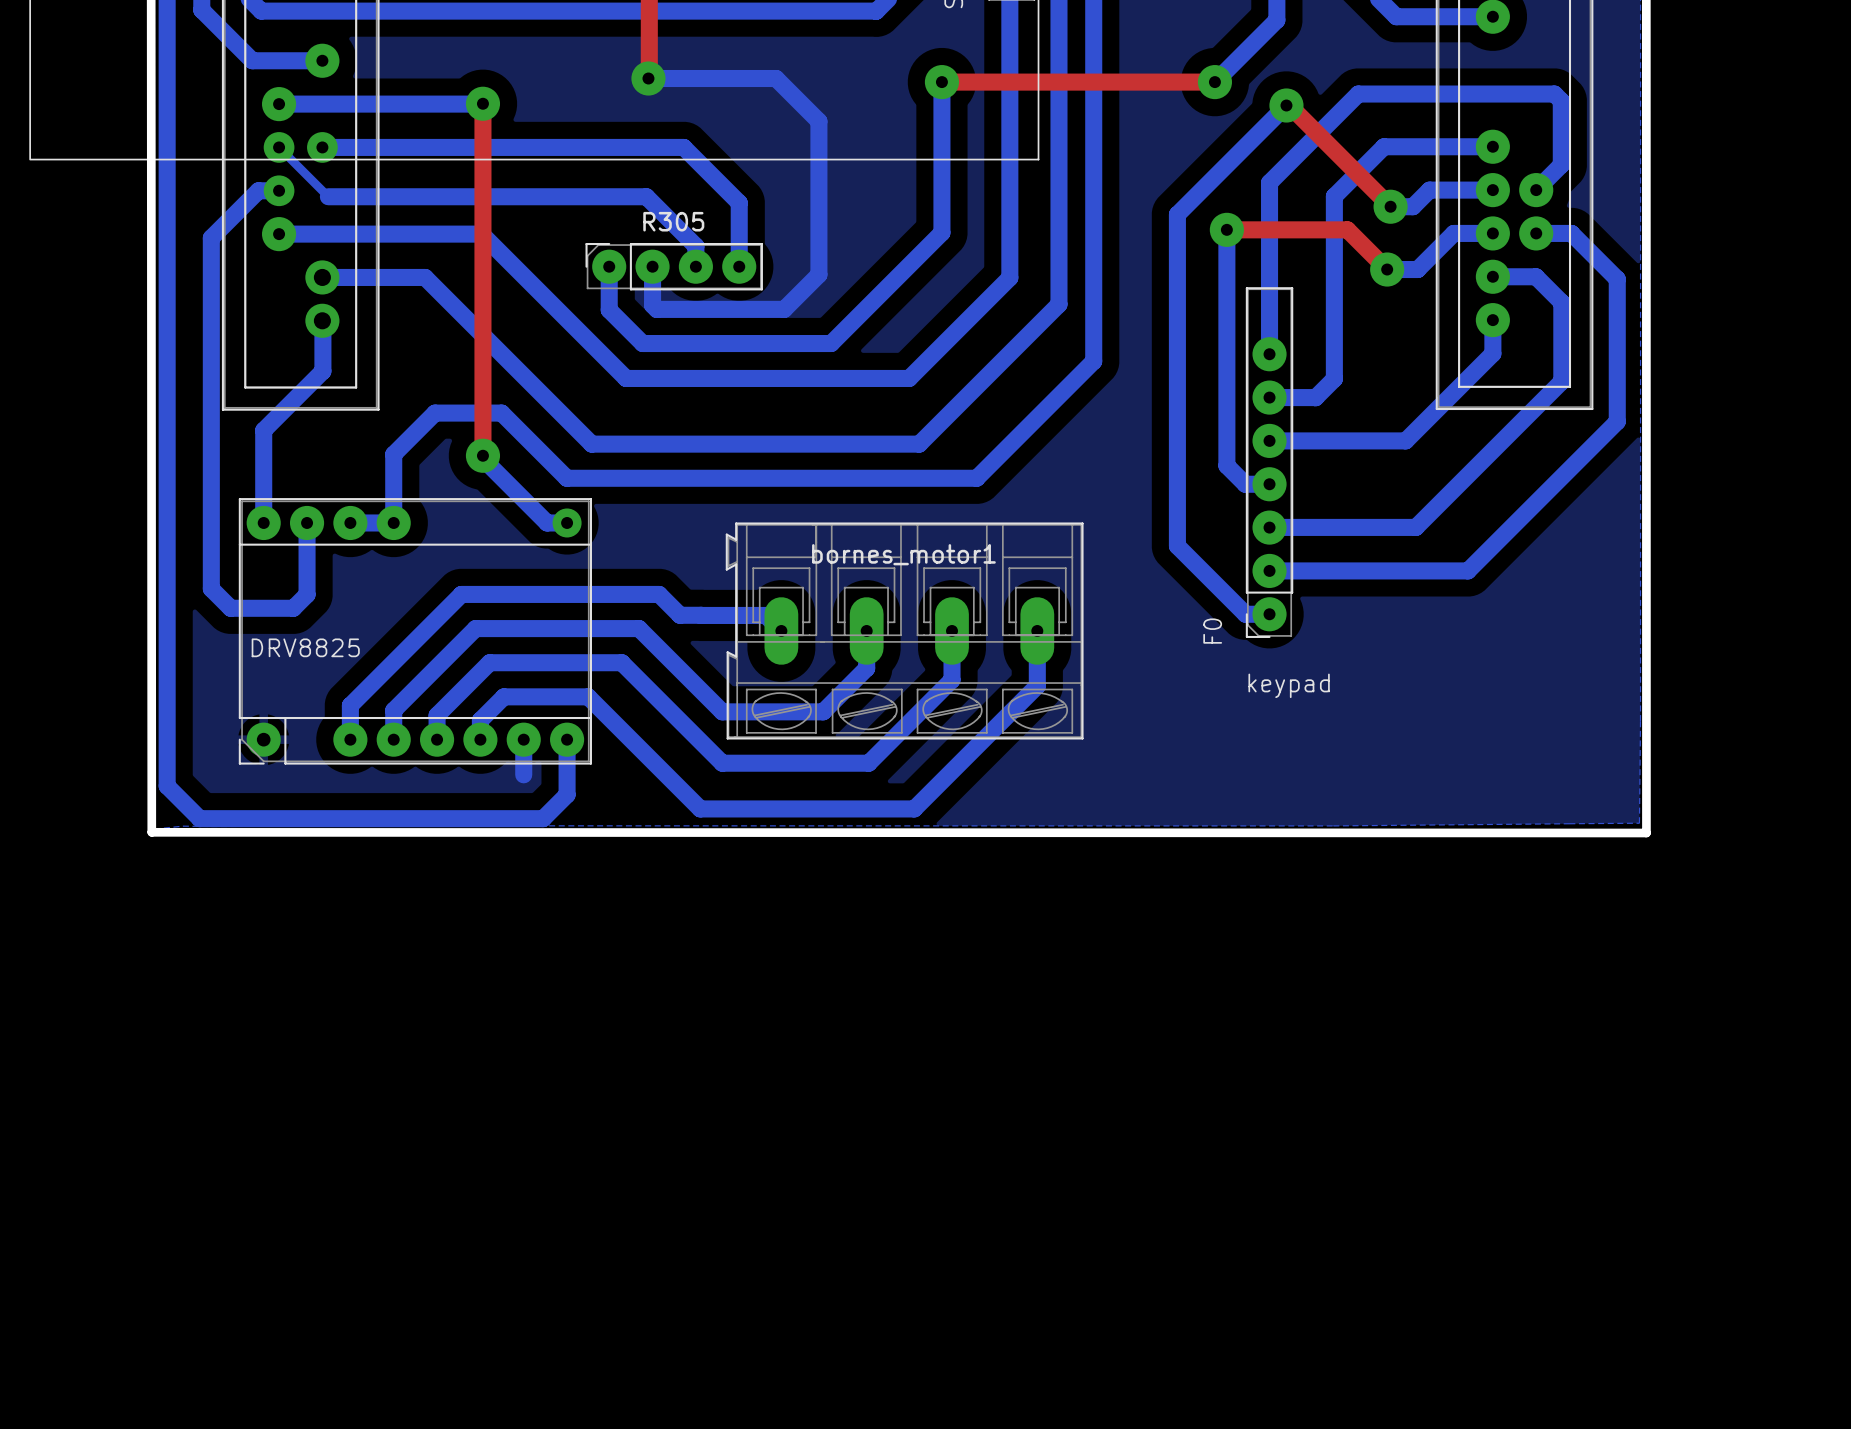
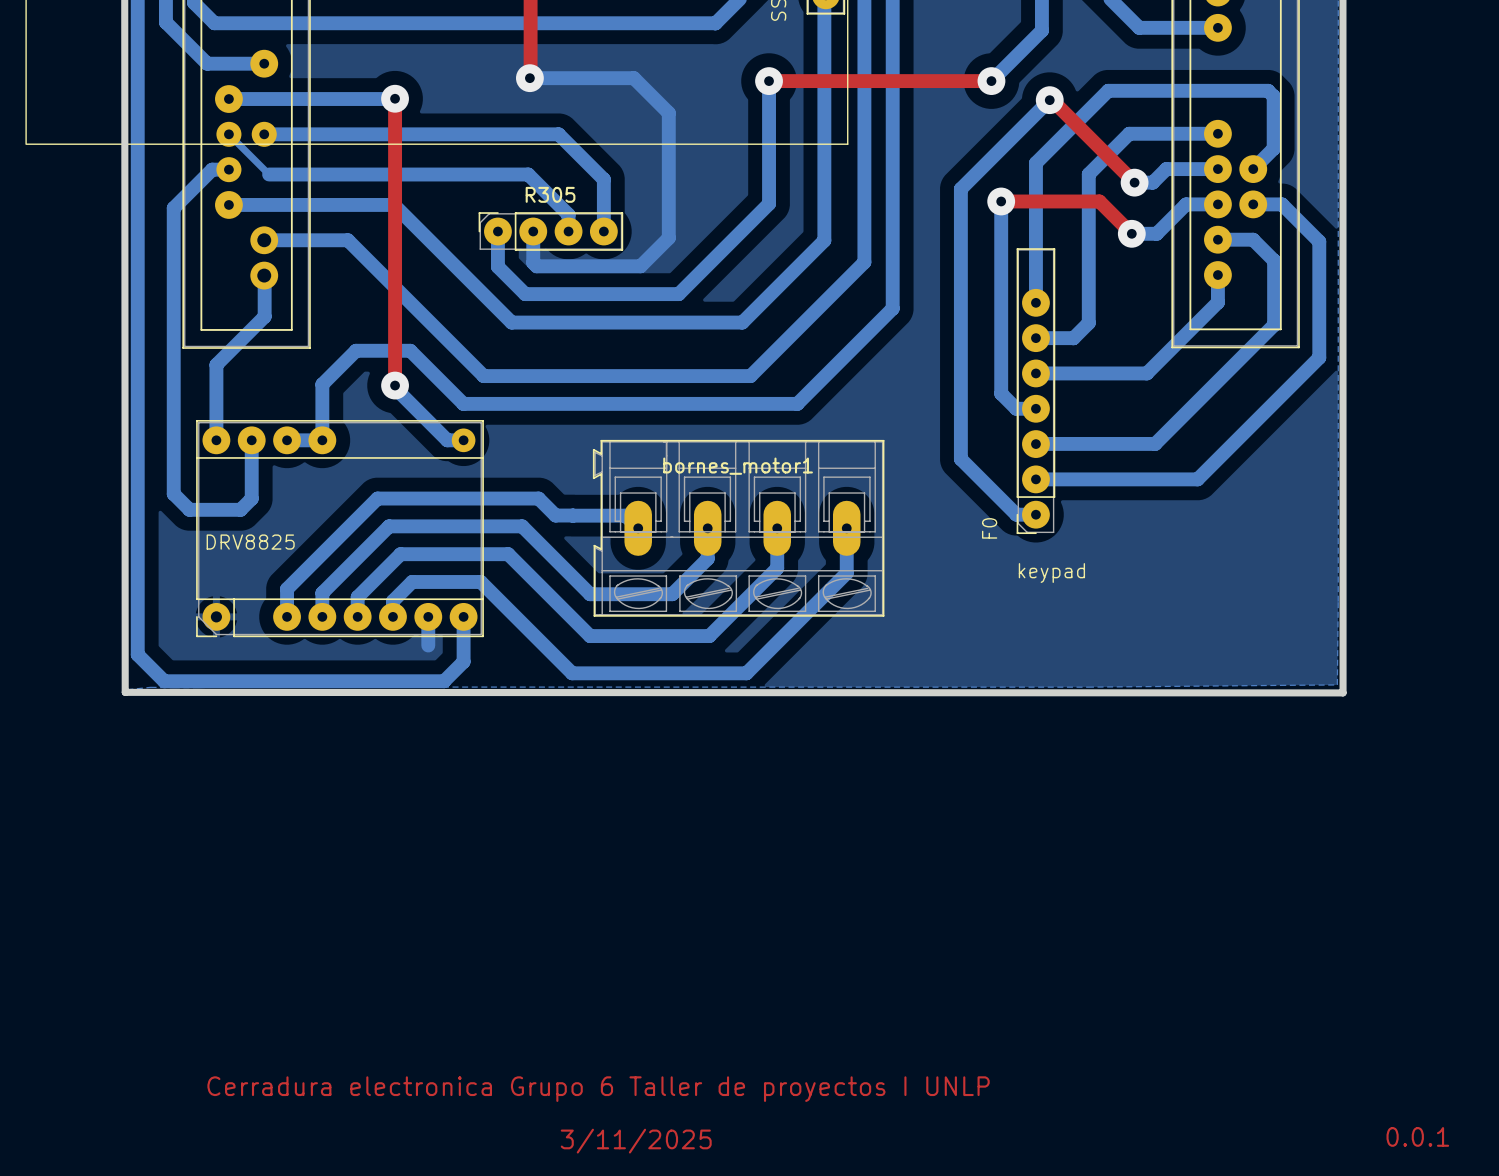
text: none -> Cerradura electronica Grupo 6 Taller de proyectos I UNLP (598, 1089)
text: none -> 0.0.1 (1417, 1136)
text: none -> 3/11/2025 (636, 1141)

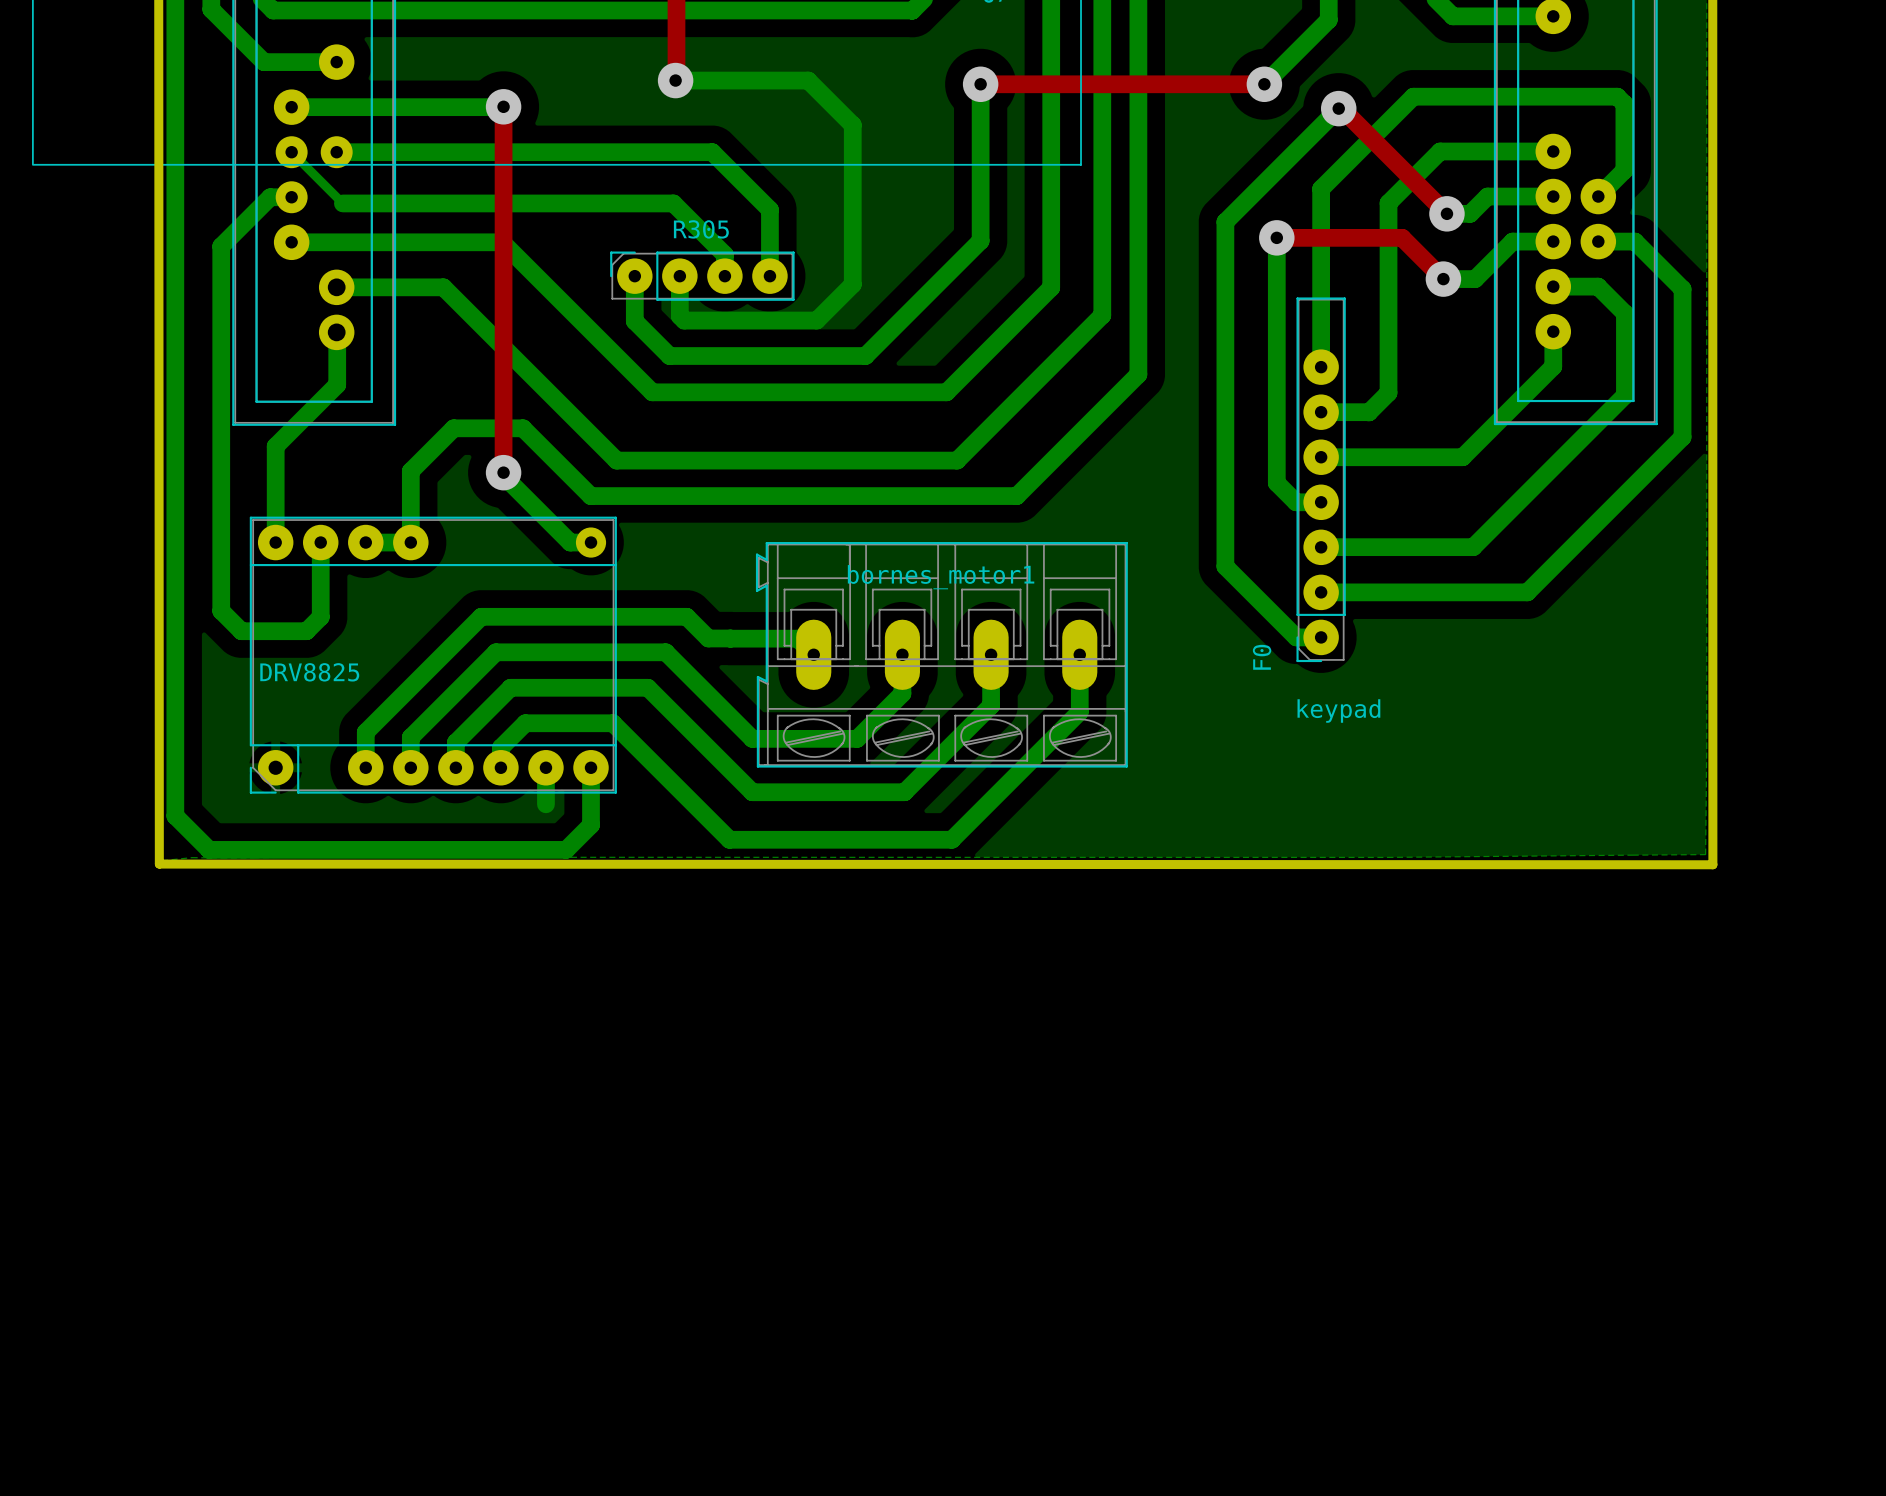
text: Cerradura electronica Grupo 6 Taller de proyectos I UNLP (598, 1089) -> none
text: 0.0.1 (1417, 1136) -> none
text: 3/11/2025 (636, 1141) -> none

